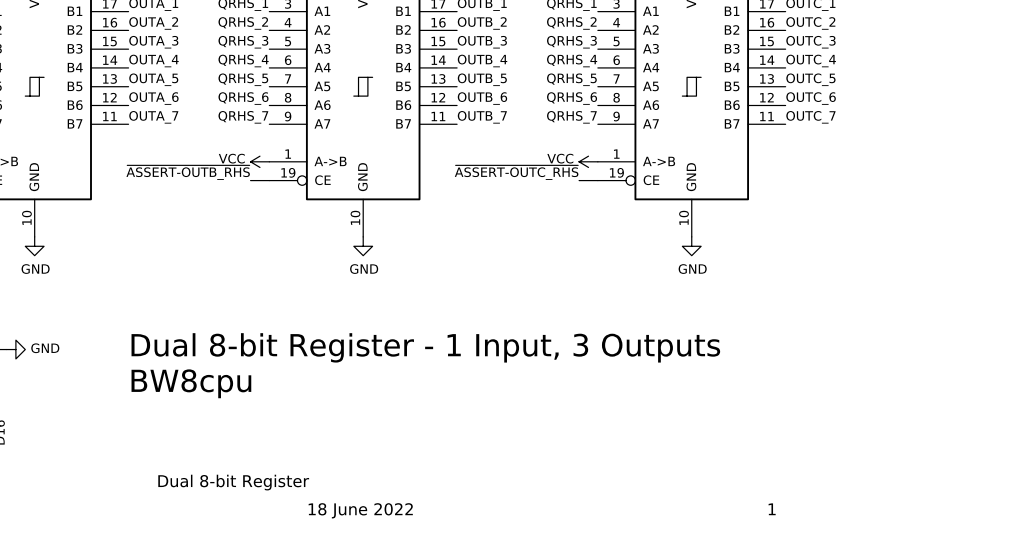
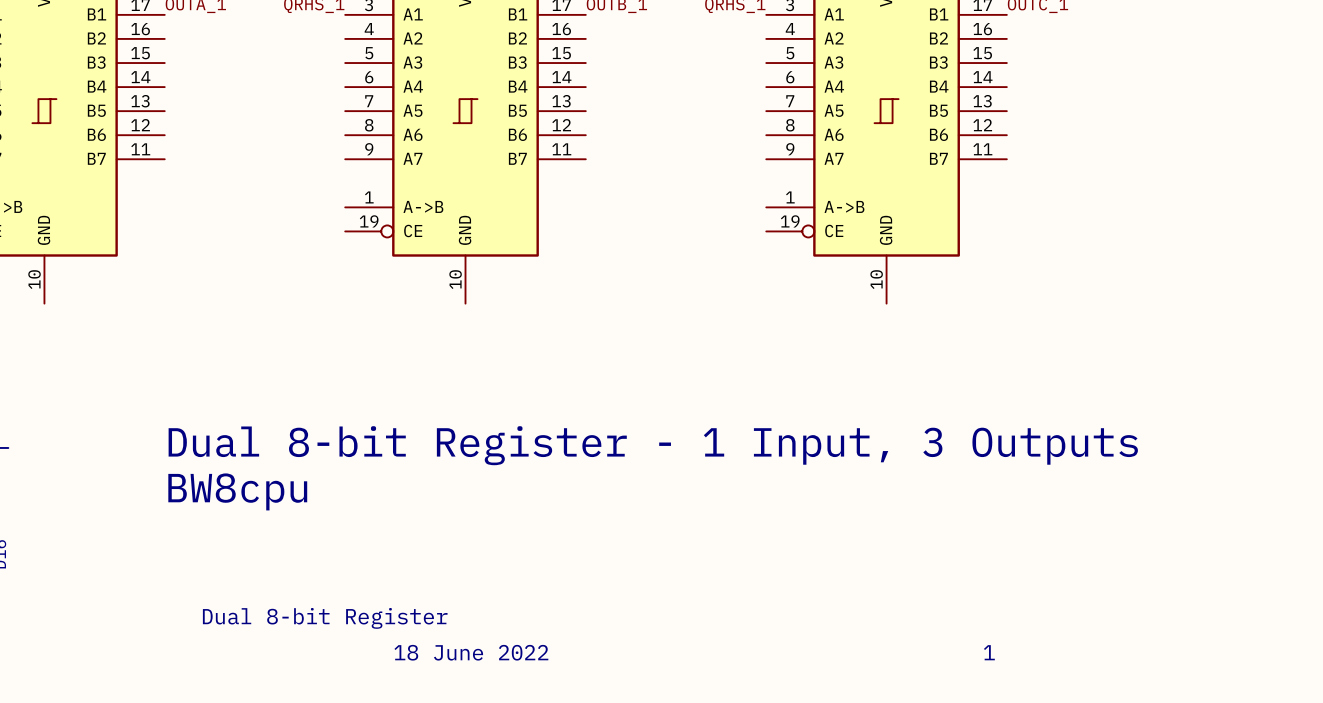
label: OUTA_2 (153, 23) -> none
label: QRHS_2 (243, 23) -> none
label: OUTB_2 (482, 23) -> none
label: QRHS_2 (571, 23) -> none
label: OUTC_2 (810, 23) -> none
label: OUTA_3 (153, 42) -> none
label: QRHS_3 (243, 42) -> none
label: OUTB_3 (482, 42) -> none
label: QRHS_3 (571, 42) -> none
label: OUTC_3 (810, 42) -> none
label: OUTA_4 (153, 61) -> none
label: QRHS_4 (243, 61) -> none
label: OUTB_4 (482, 61) -> none
label: QRHS_4 (572, 61) -> none
label: OUTC_4 (811, 61) -> none
label: OUTA_5 (153, 79) -> none
label: QRHS_5 (243, 79) -> none
label: OUTB_5 (482, 79) -> none
label: QRHS_5 (571, 79) -> none
label: OUTC_5 (810, 79) -> none
label: OUTA_6 (153, 98) -> none
label: QRHS_6 (243, 98) -> none
label: OUTB_6 (482, 98) -> none
label: QRHS_6 (572, 98) -> none
label: OUTC_6 (811, 98) -> none
label: OUTA_7 (153, 117) -> none
label: QRHS_7 (243, 117) -> none
label: OUTB_7 (482, 117) -> none
label: QRHS_7 (571, 117) -> none
label: OUTC_7 (810, 117) -> none
power symbol: VCC (259, 161) -> none
power symbol: VCC (588, 161) -> none
label: ~{ASSERT-OUTB_RHS} (188, 172) -> none
label: ~{ASSERT-OUTC_RHS} (516, 172) -> none
wire: (250, 180) (269, 180) -> none
wire: (579, 180) (597, 180) -> none
power symbol: GND (34, 246) -> none
power symbol: GND (363, 246) -> none
power symbol: GND (691, 246) -> none
power symbol: GND (15, 349) -> none

